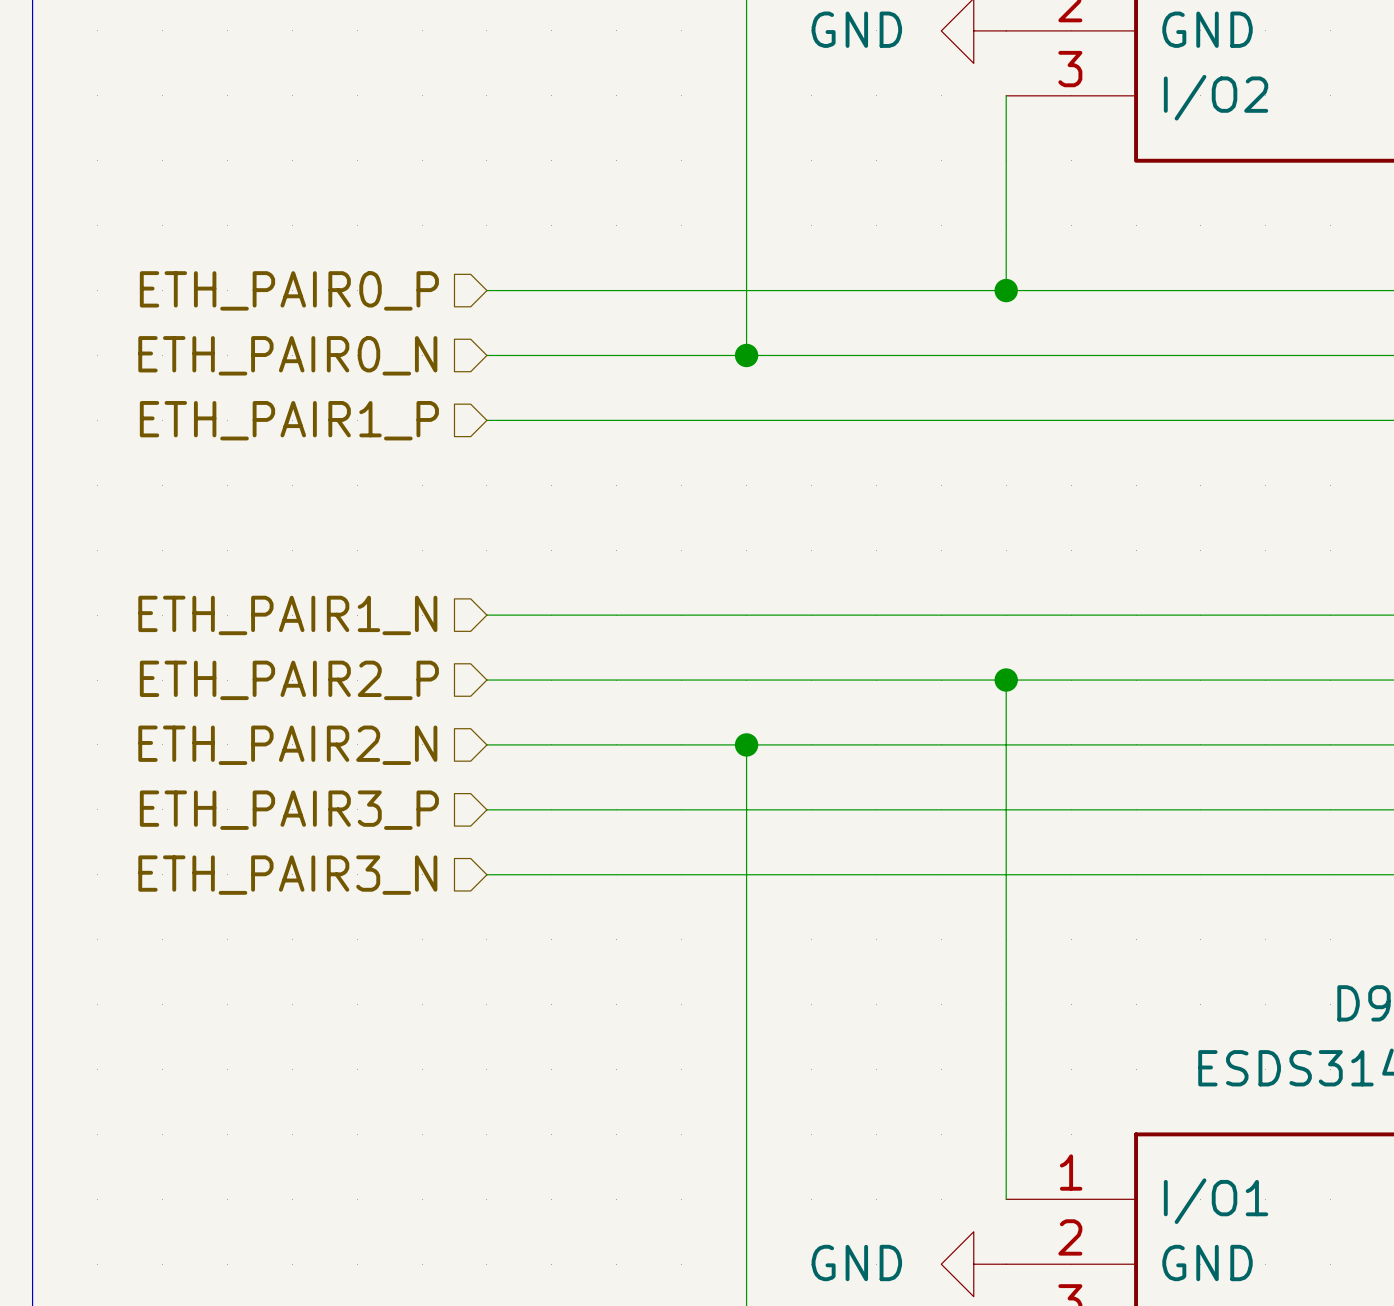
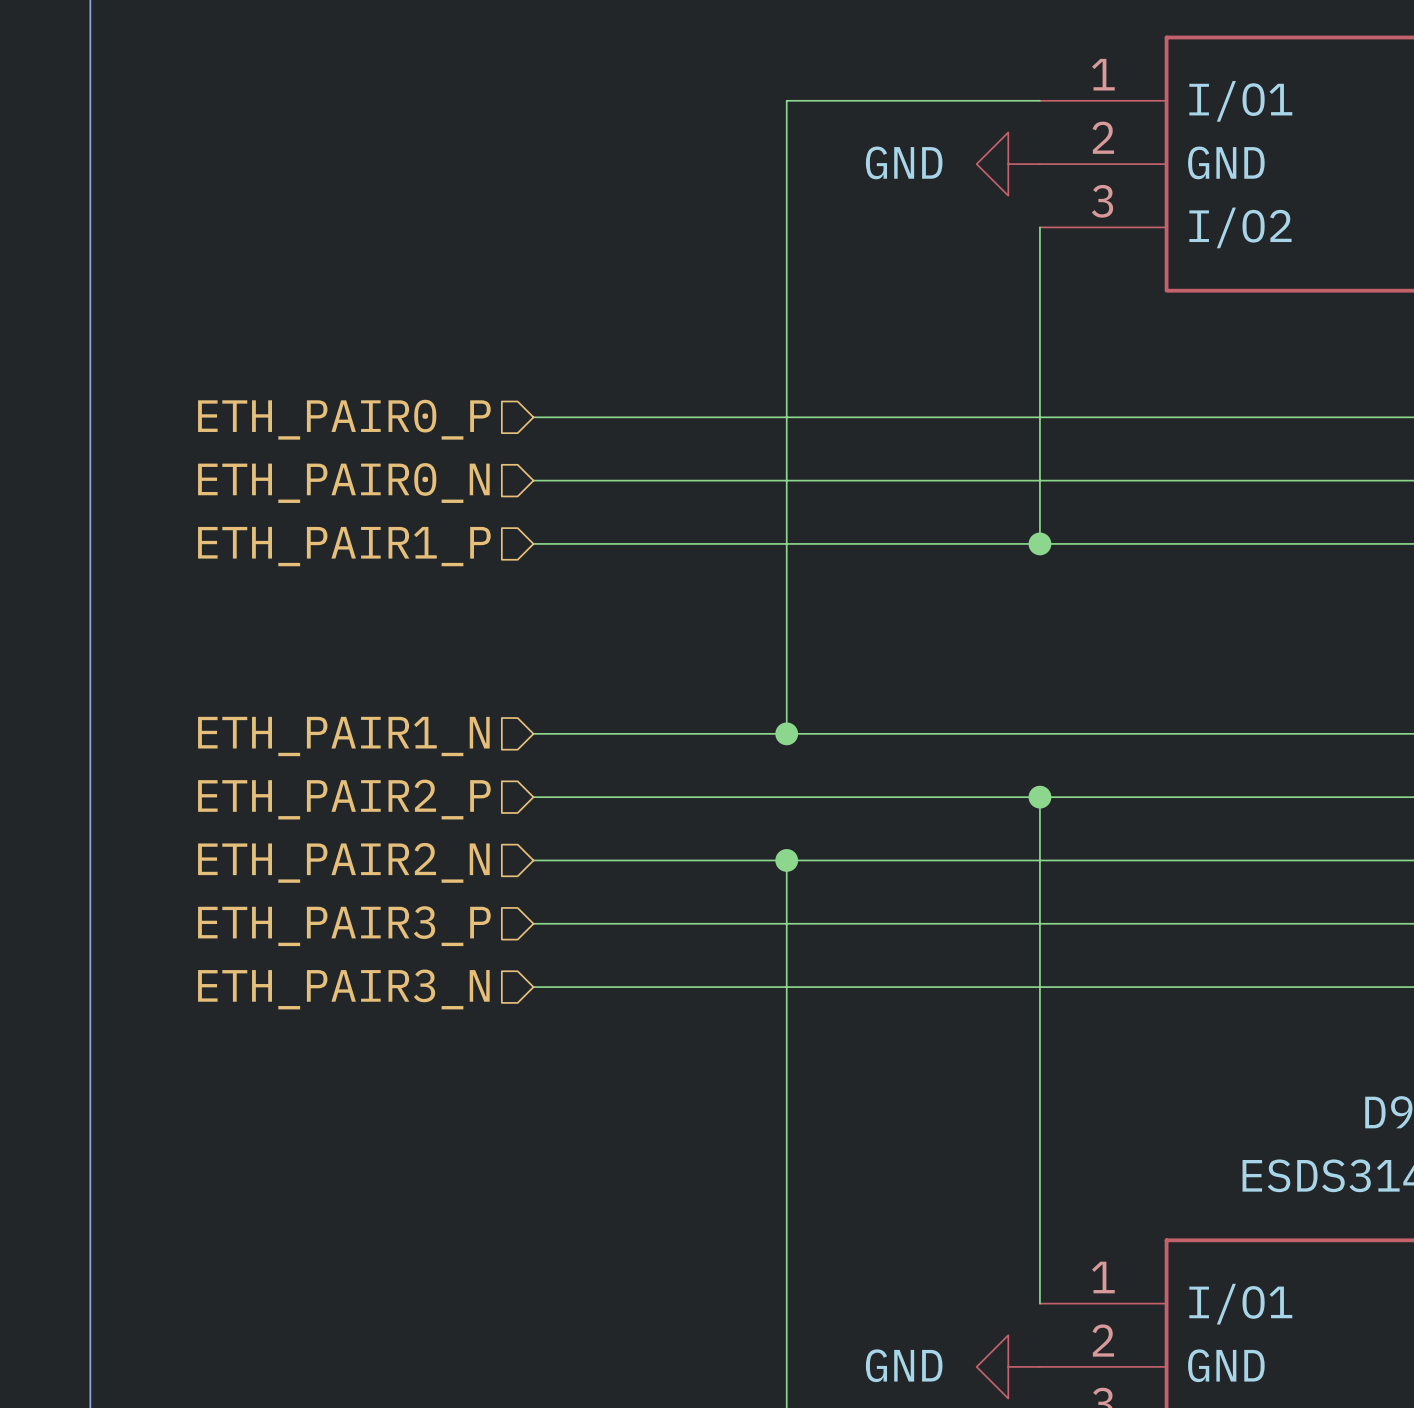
wire: none -> (1039, 417) (1039, 543)
junction position: (1006, 290) -> (1039, 543)
wire: none -> (786, 480) (786, 733)
junction: (746, 355) -> none
junction: none -> (786, 733)

